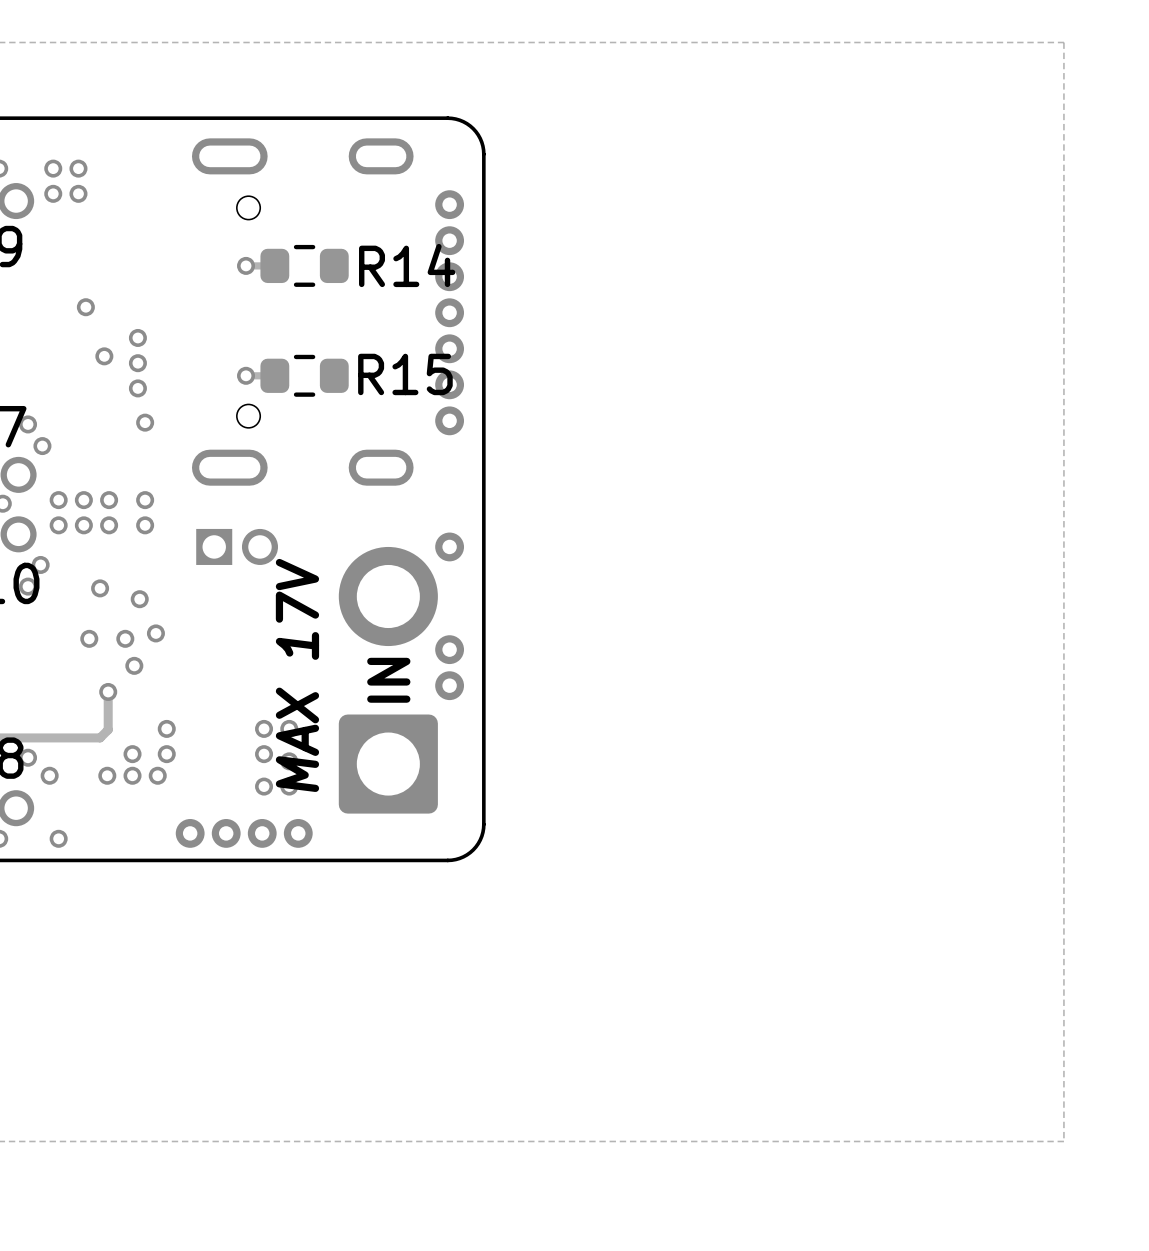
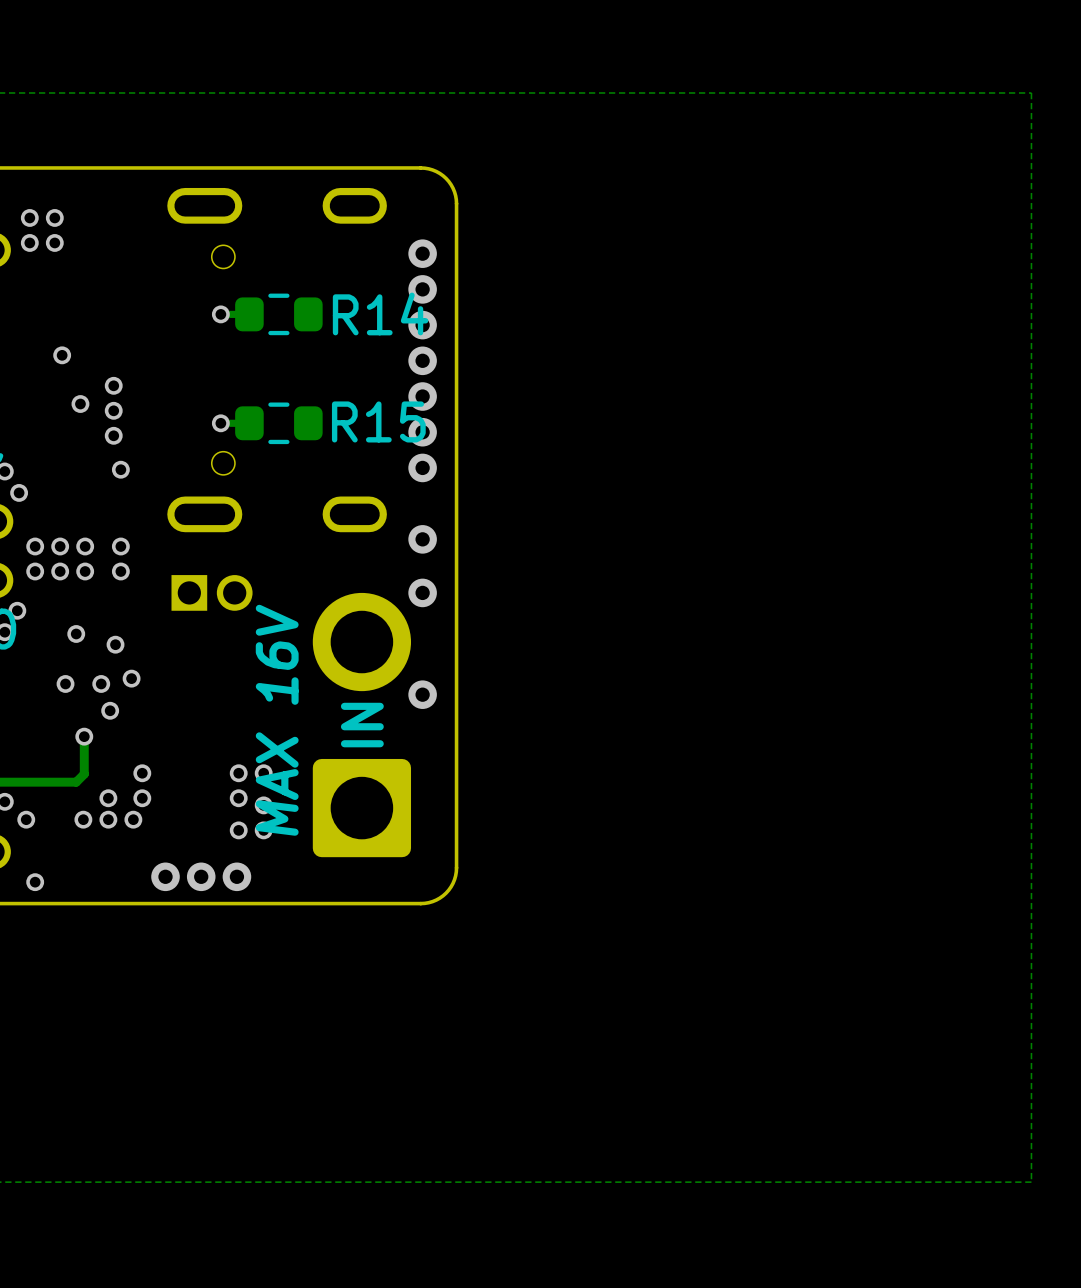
via: none -> (422, 539)
text: MAX 17V (297, 675) -> MAX 16V (277, 720)
via: (449, 685) -> none
via: (298, 833) -> none

